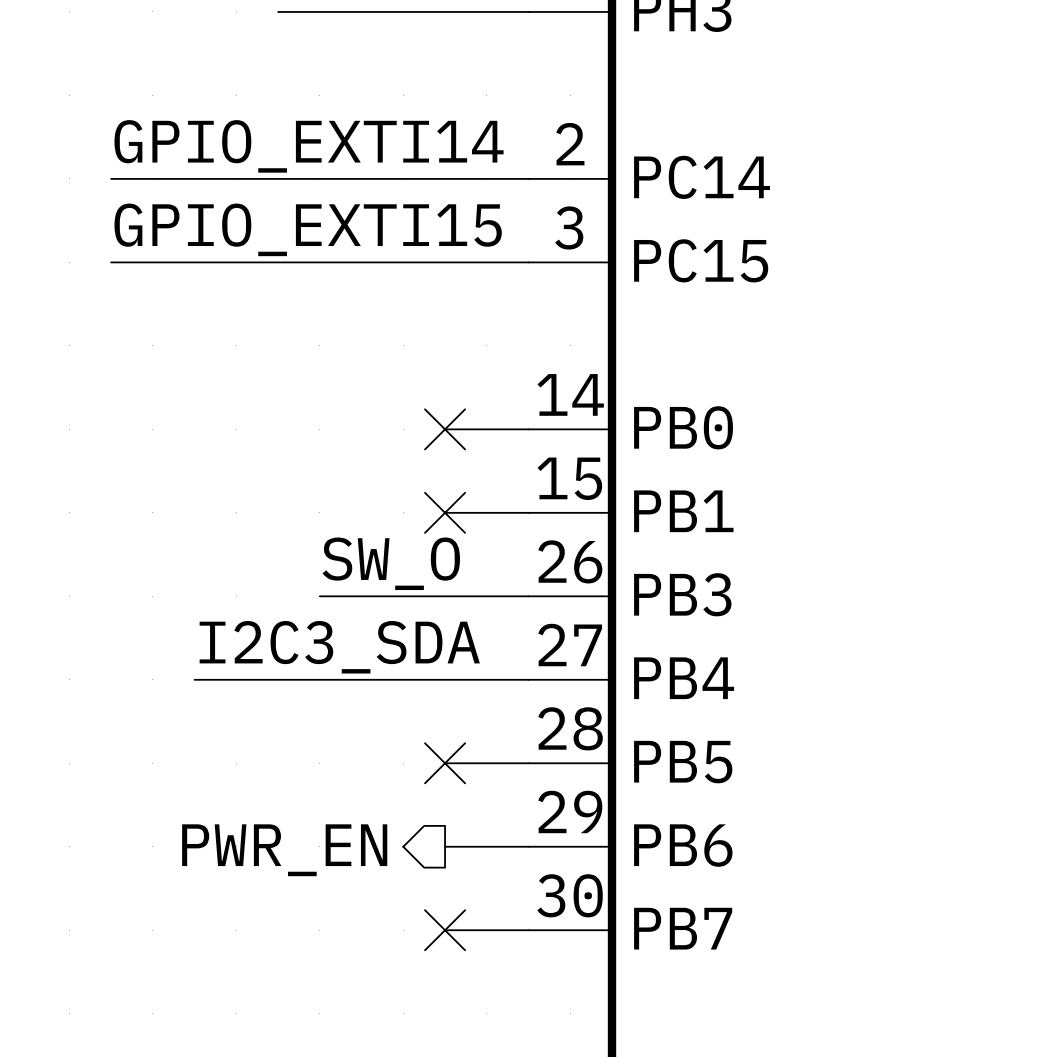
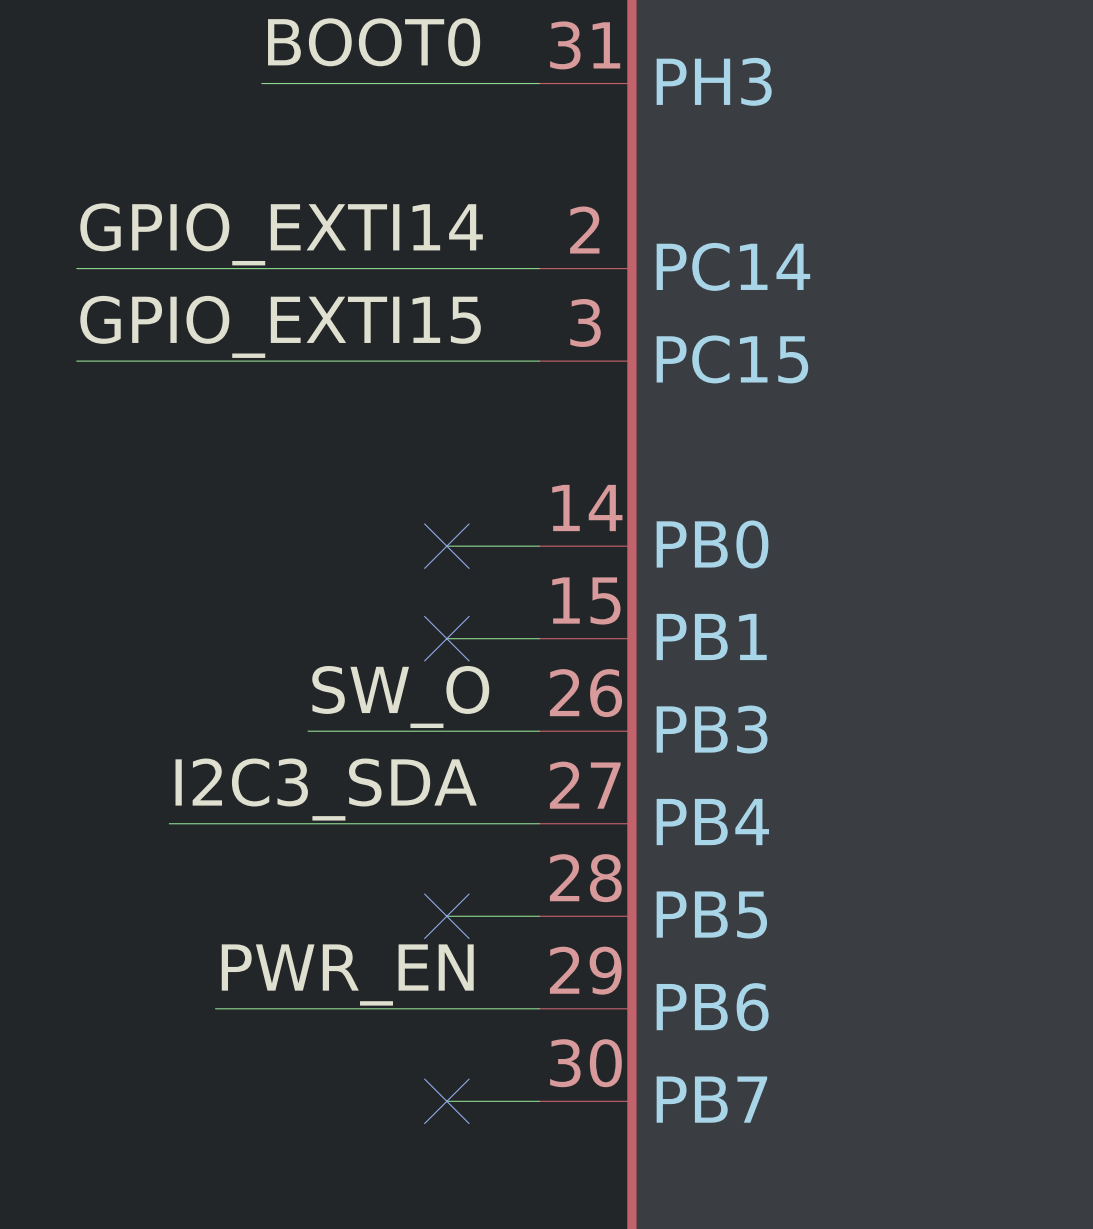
label: none -> PWR_EN (347, 974)
wire: none -> (215, 1008) (446, 1008)
hierarchical label: PWR_EN (284, 850) -> none

